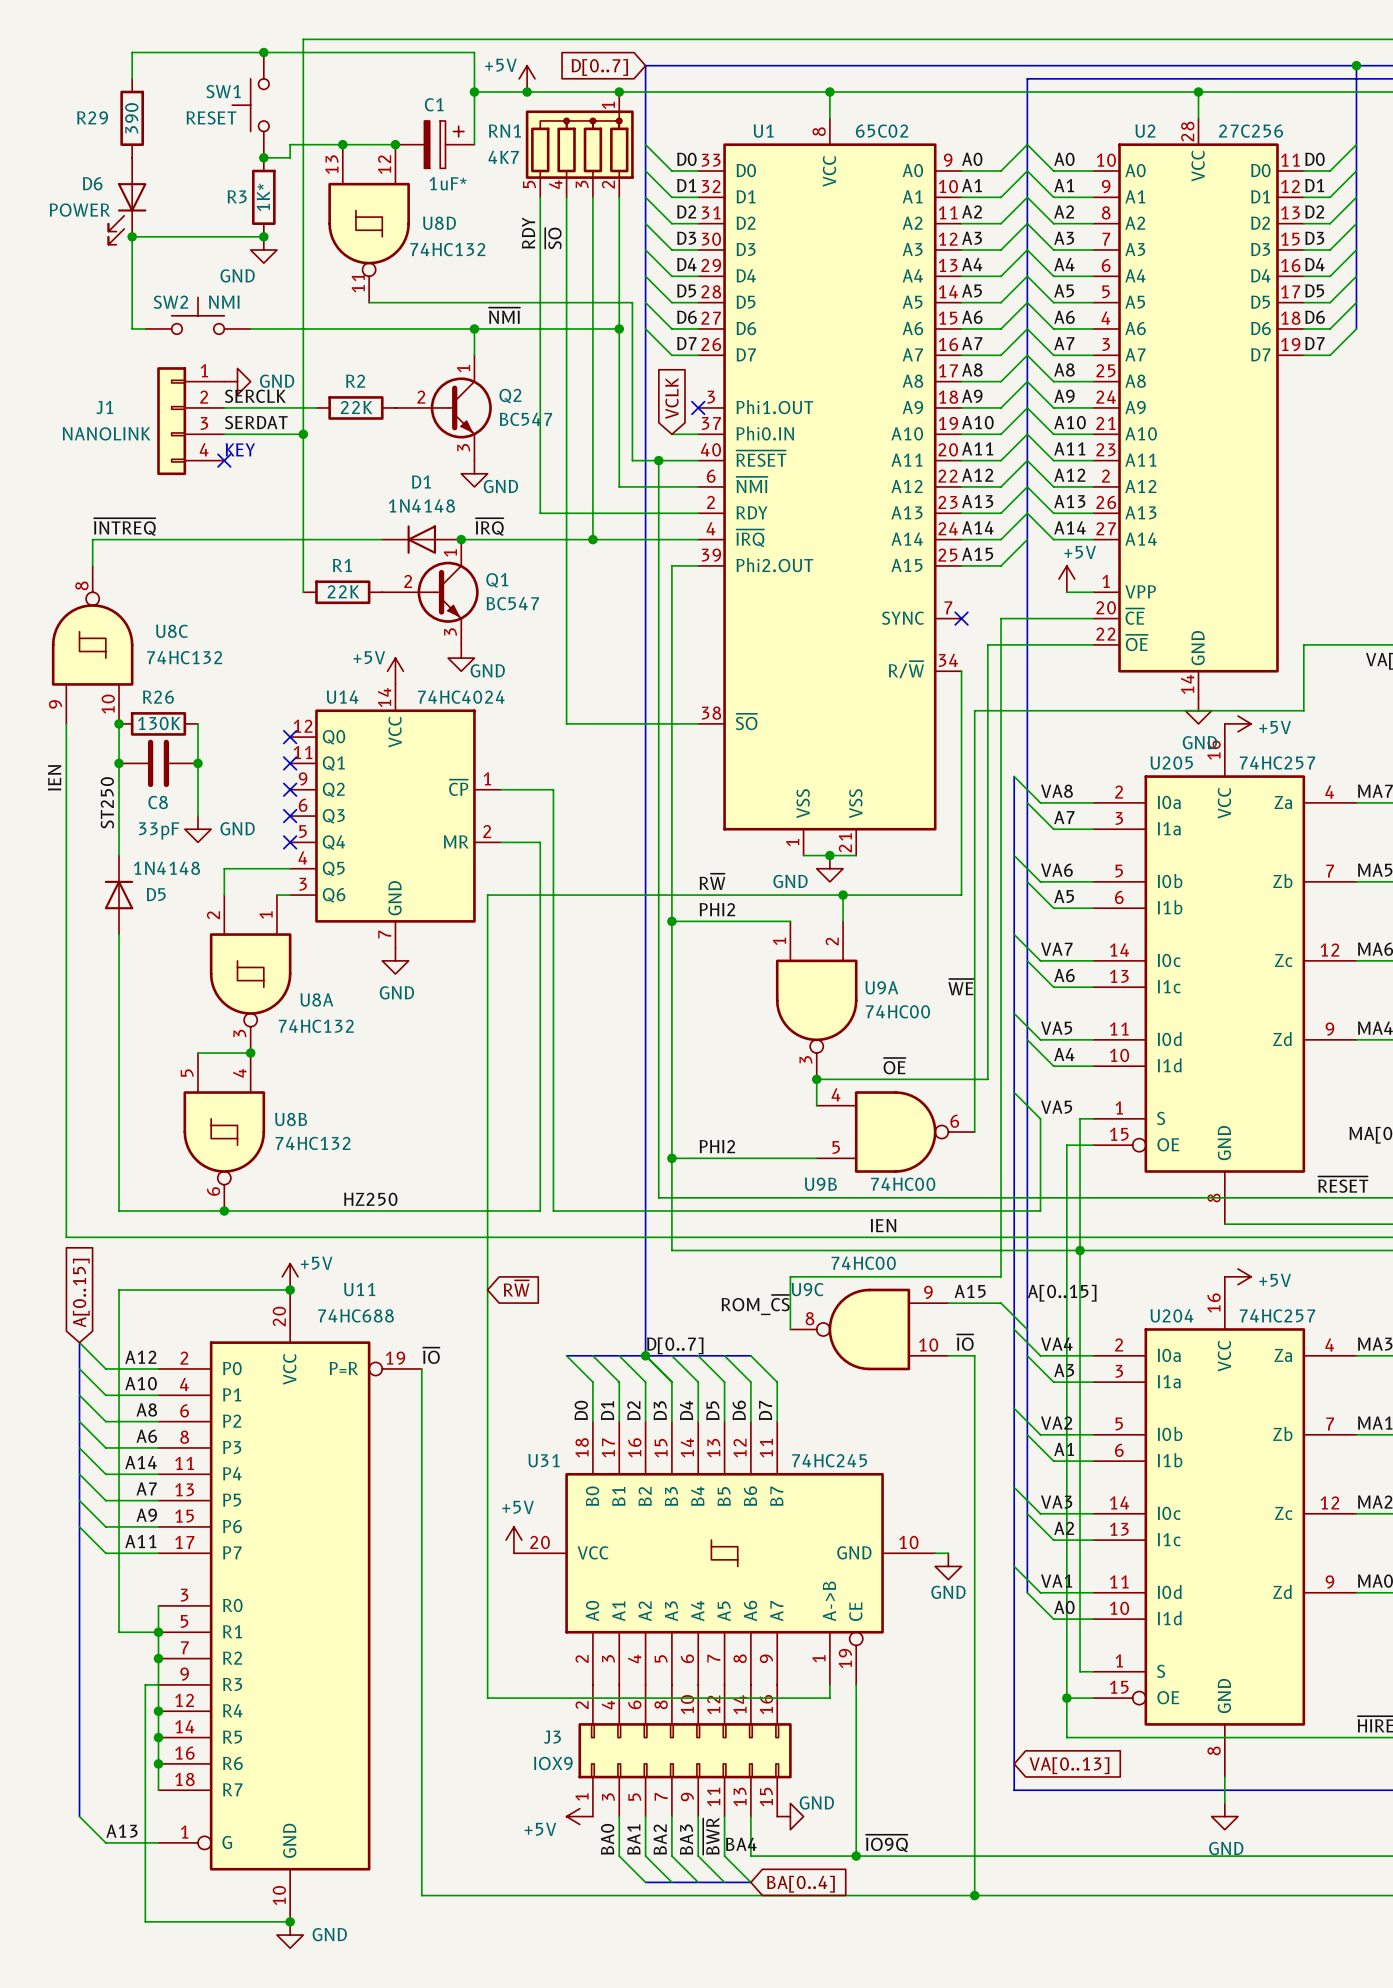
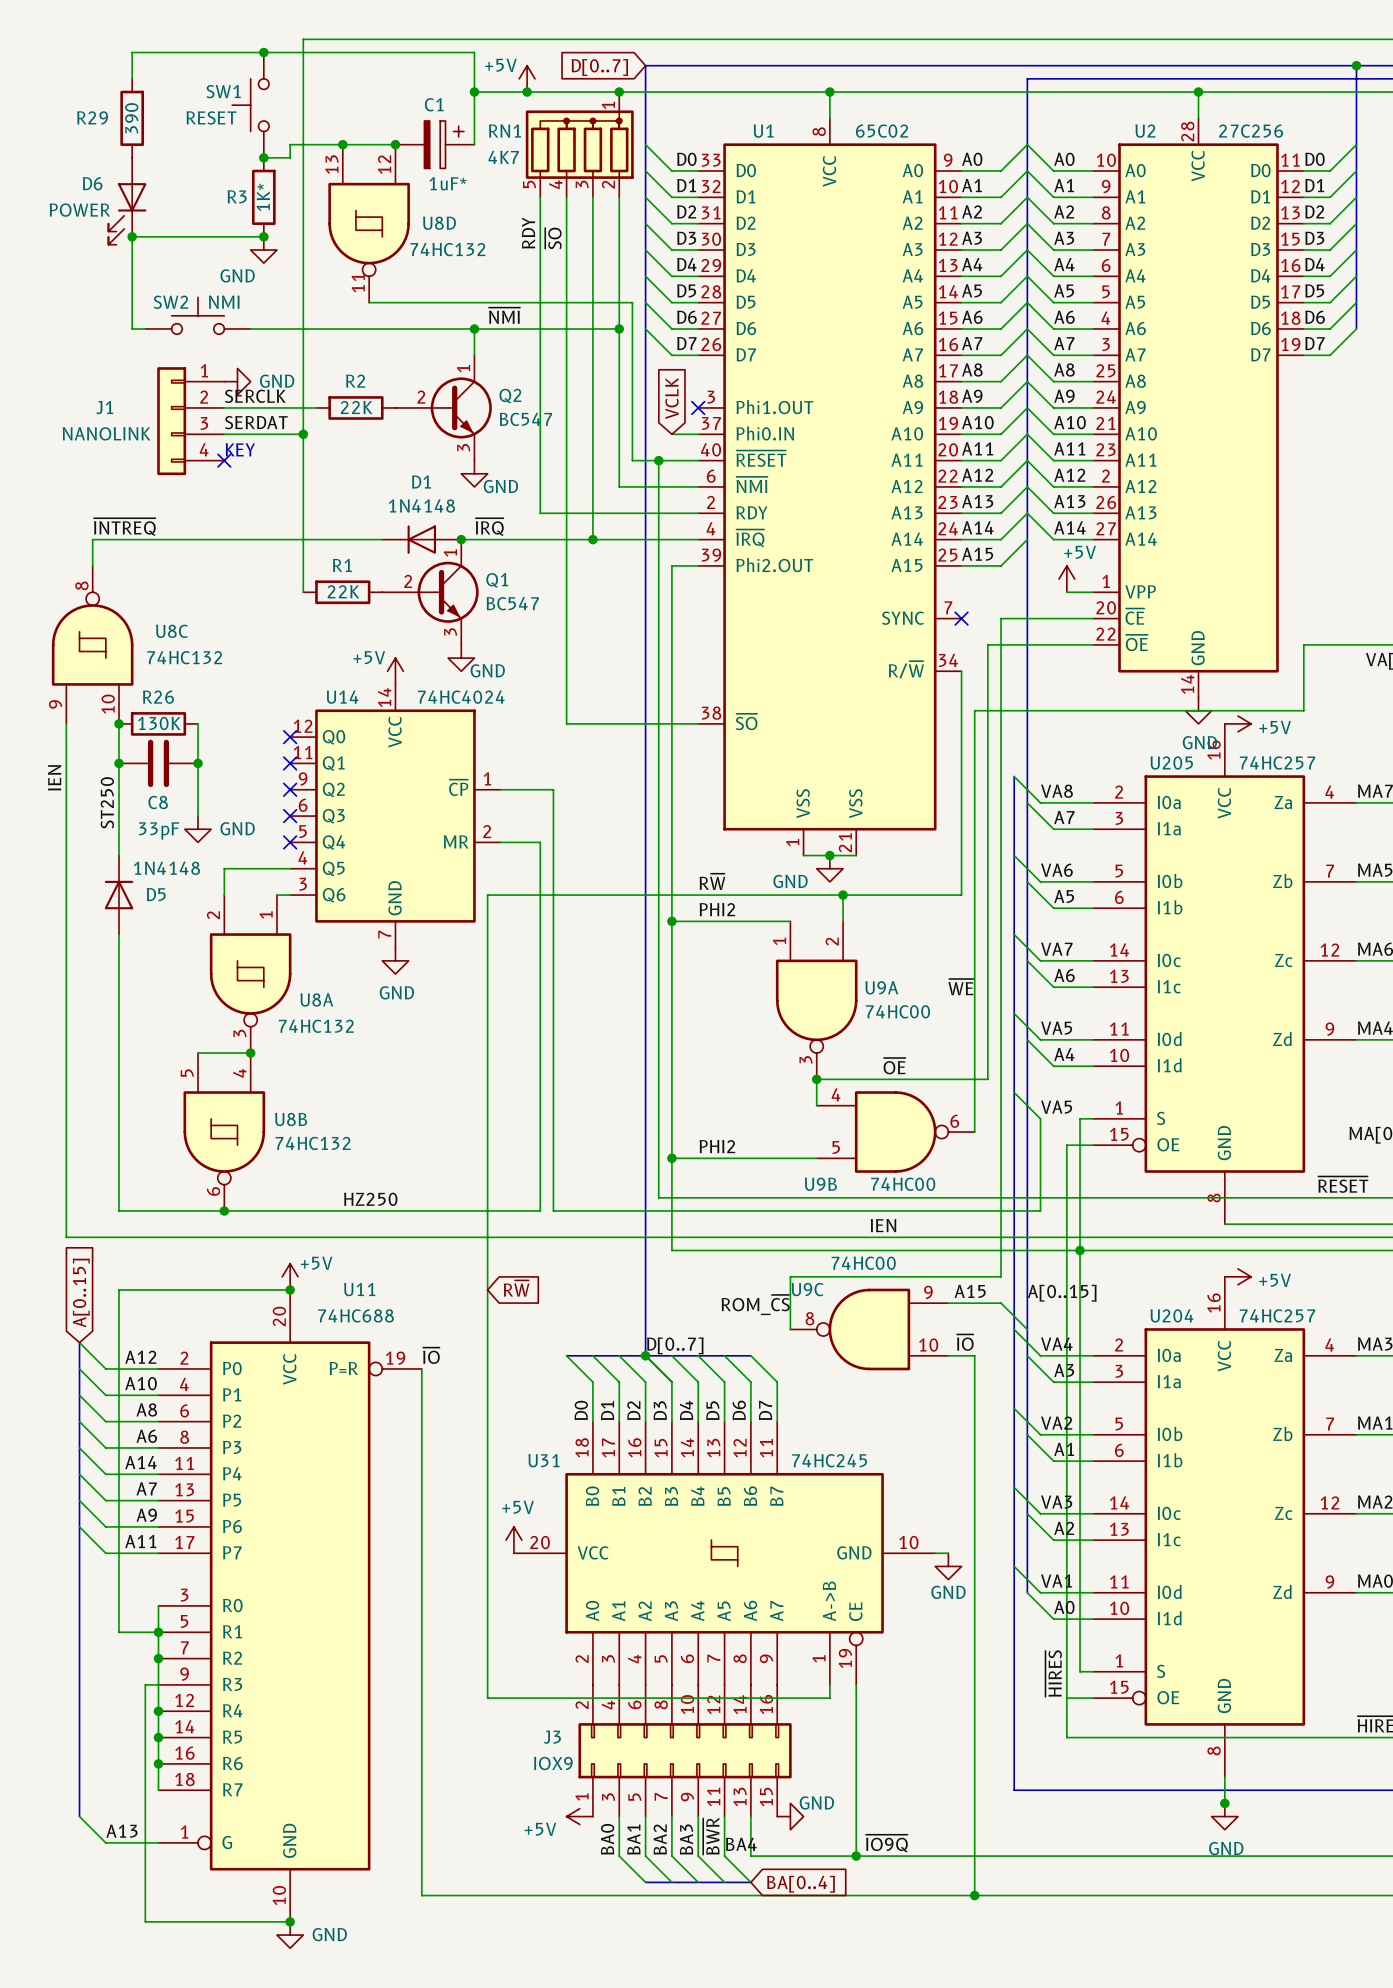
label: none -> ~{HIRES} (1053, 1673)
junction: (1066, 1698) -> none
global label: VA[0..13] (1069, 1765) -> none
junction: none -> (1224, 1803)

